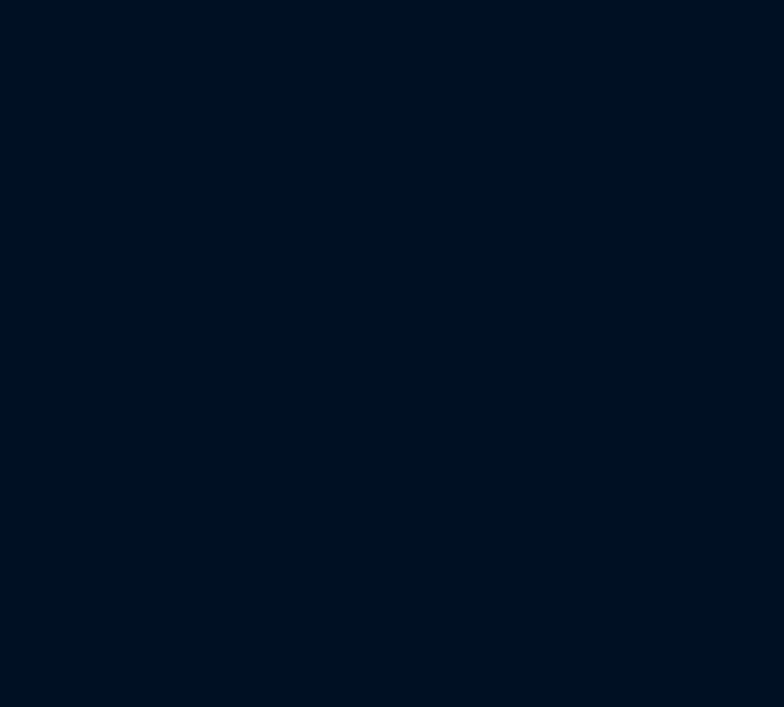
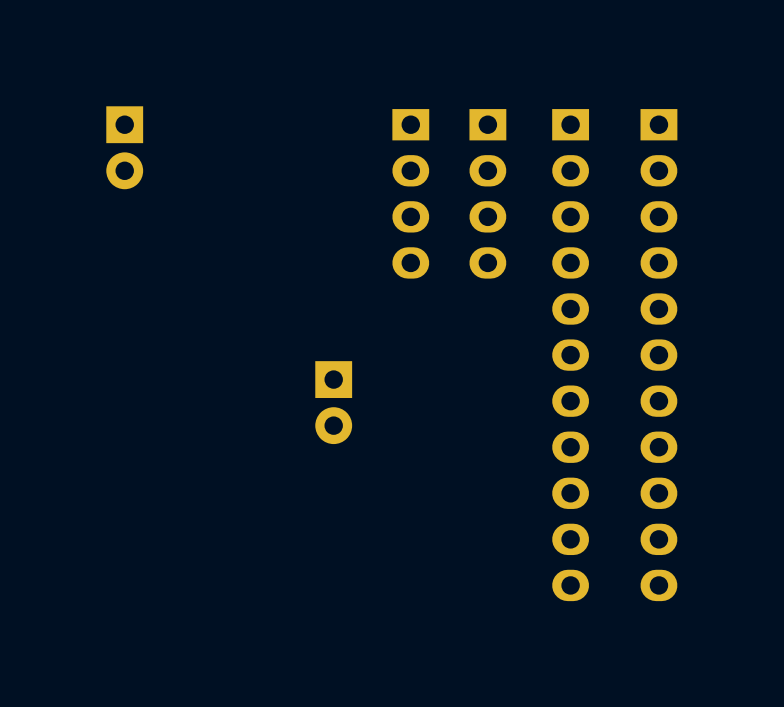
part: none -> (124, 147)
part: none -> (410, 193)
part: none -> (487, 193)
part: none -> (570, 355)
part: none -> (658, 355)
part: none -> (333, 402)

